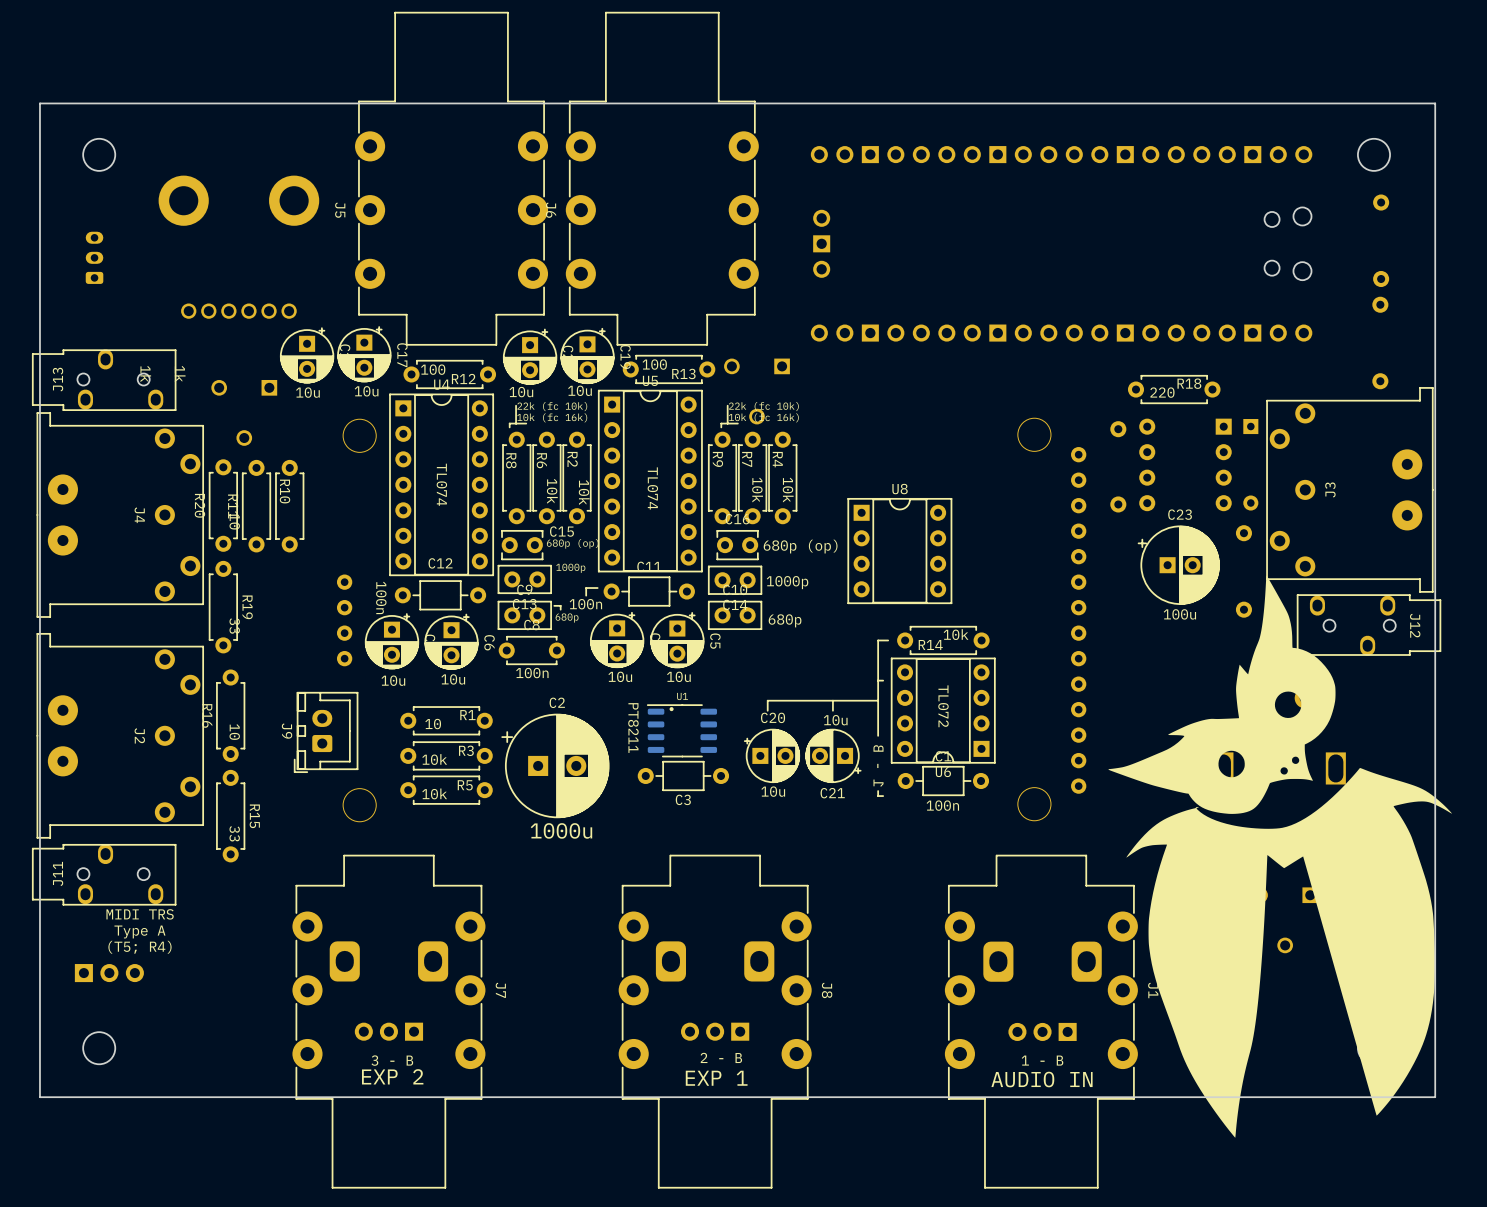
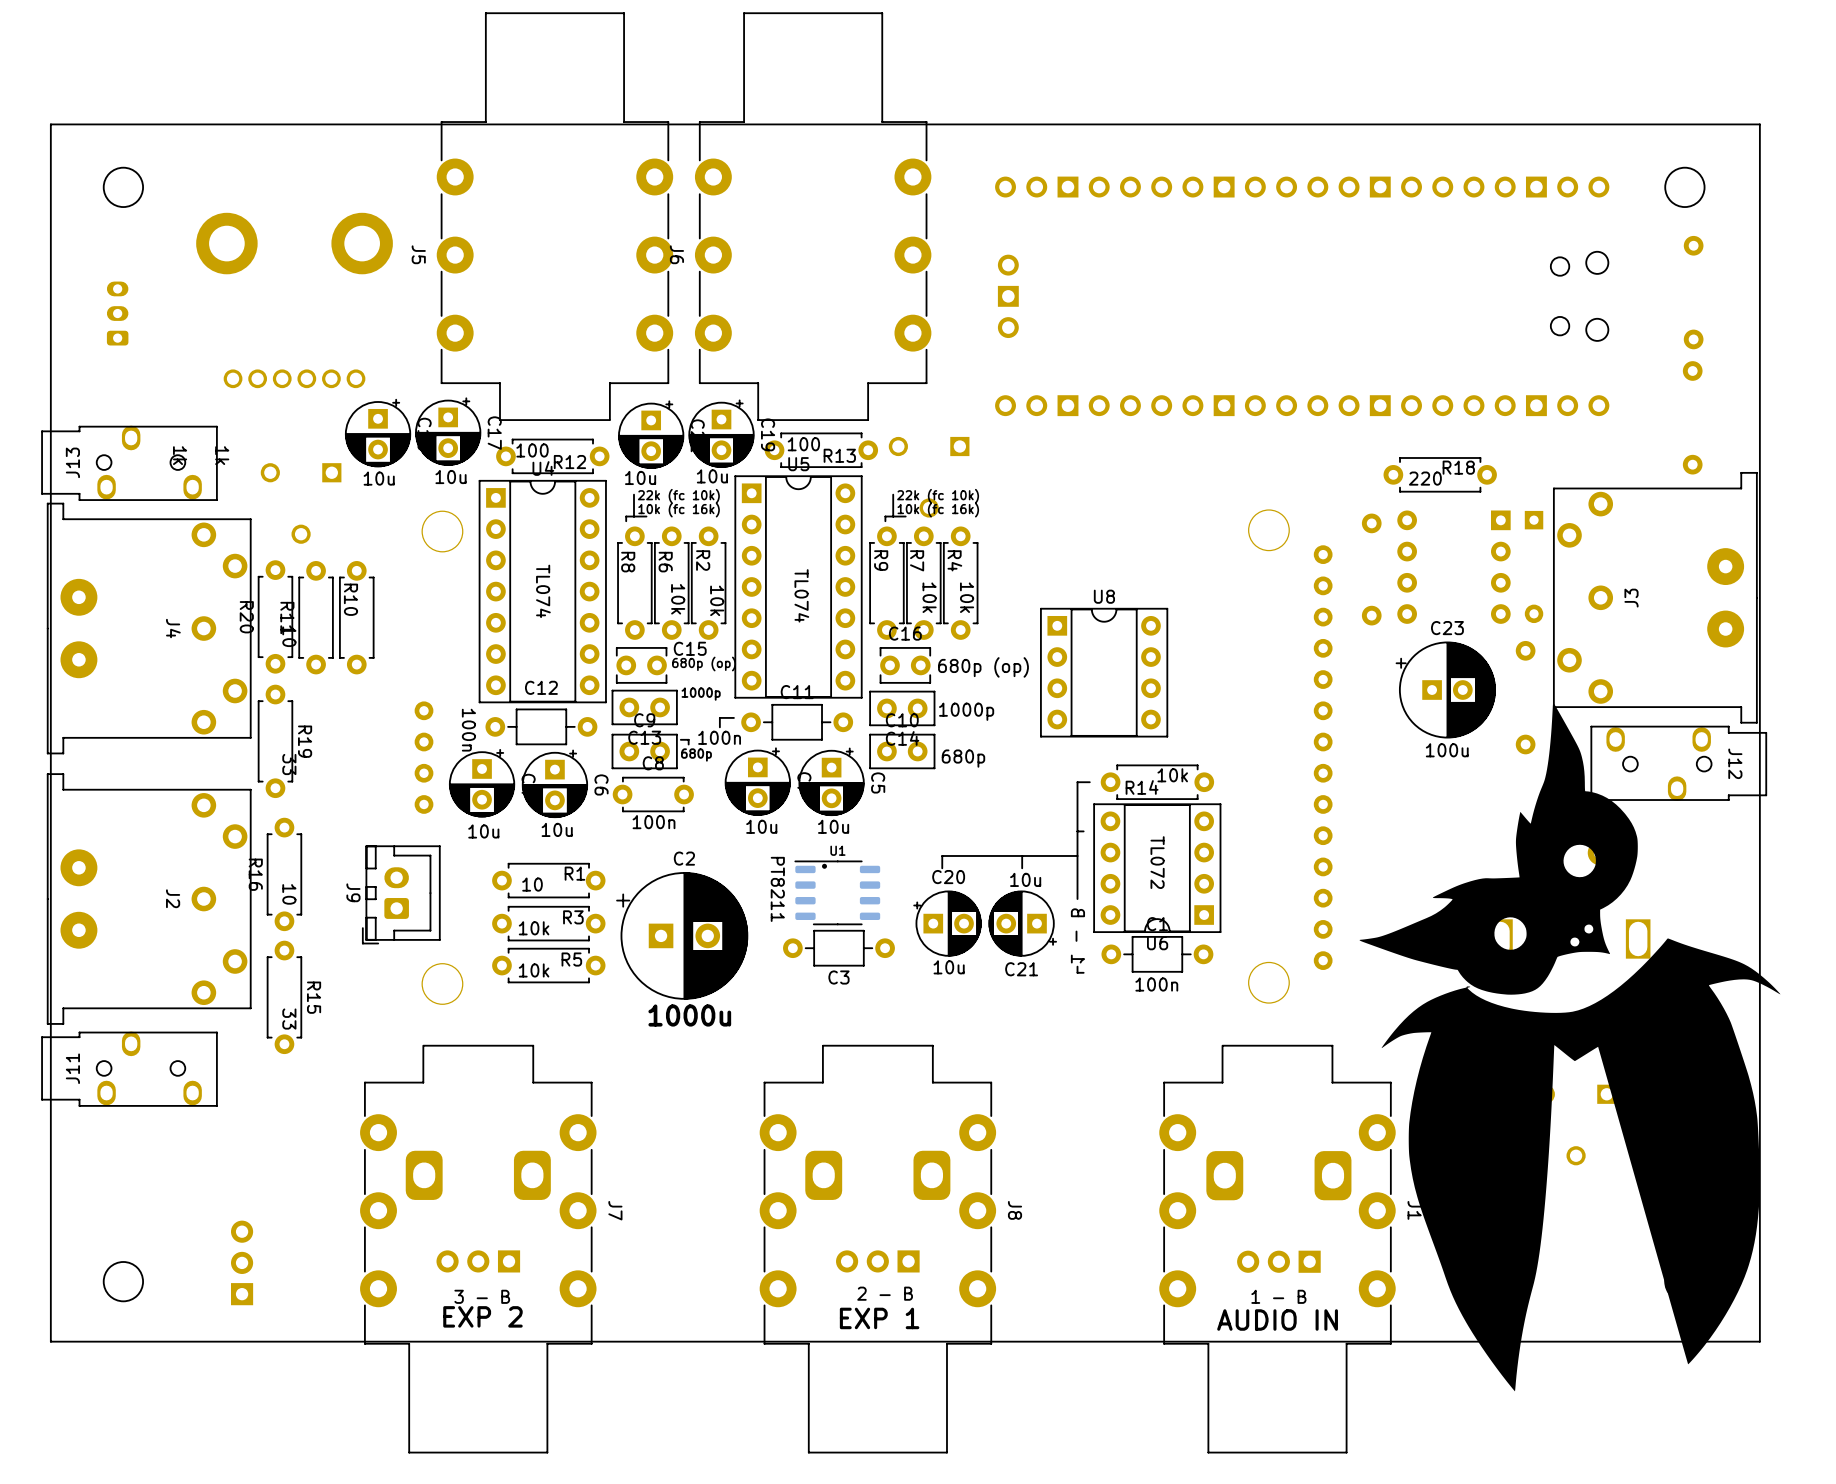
text: MIDI TRS (140, 914) -> none
text: Type A (139, 931) -> none
text: (T5; R4) (139, 947) -> none
part rotation: 0° (109, 973) -> 90° counterclockwise (242, 1262)
part position: (109, 973) -> (242, 1262)

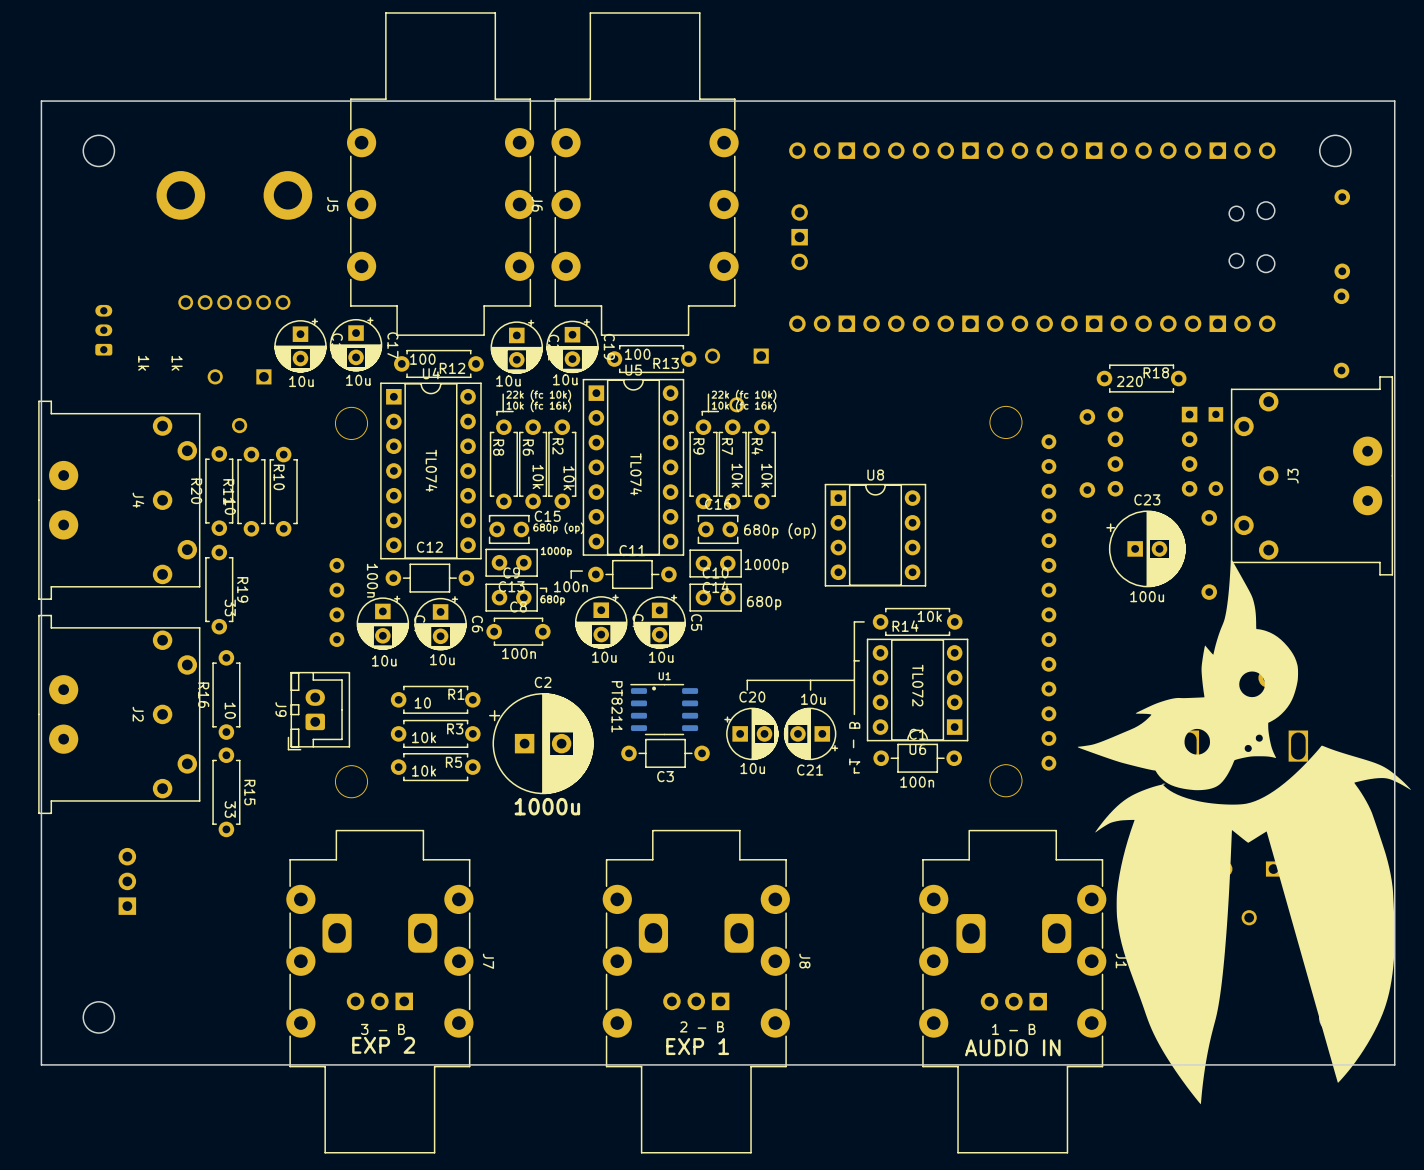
part position: (117, 313) -> (103, 330)
J13: (129, 463) -> none
J12: (1678, 763) -> none
J11: (129, 1069) -> none
part position: (242, 1262) -> (127, 881)

